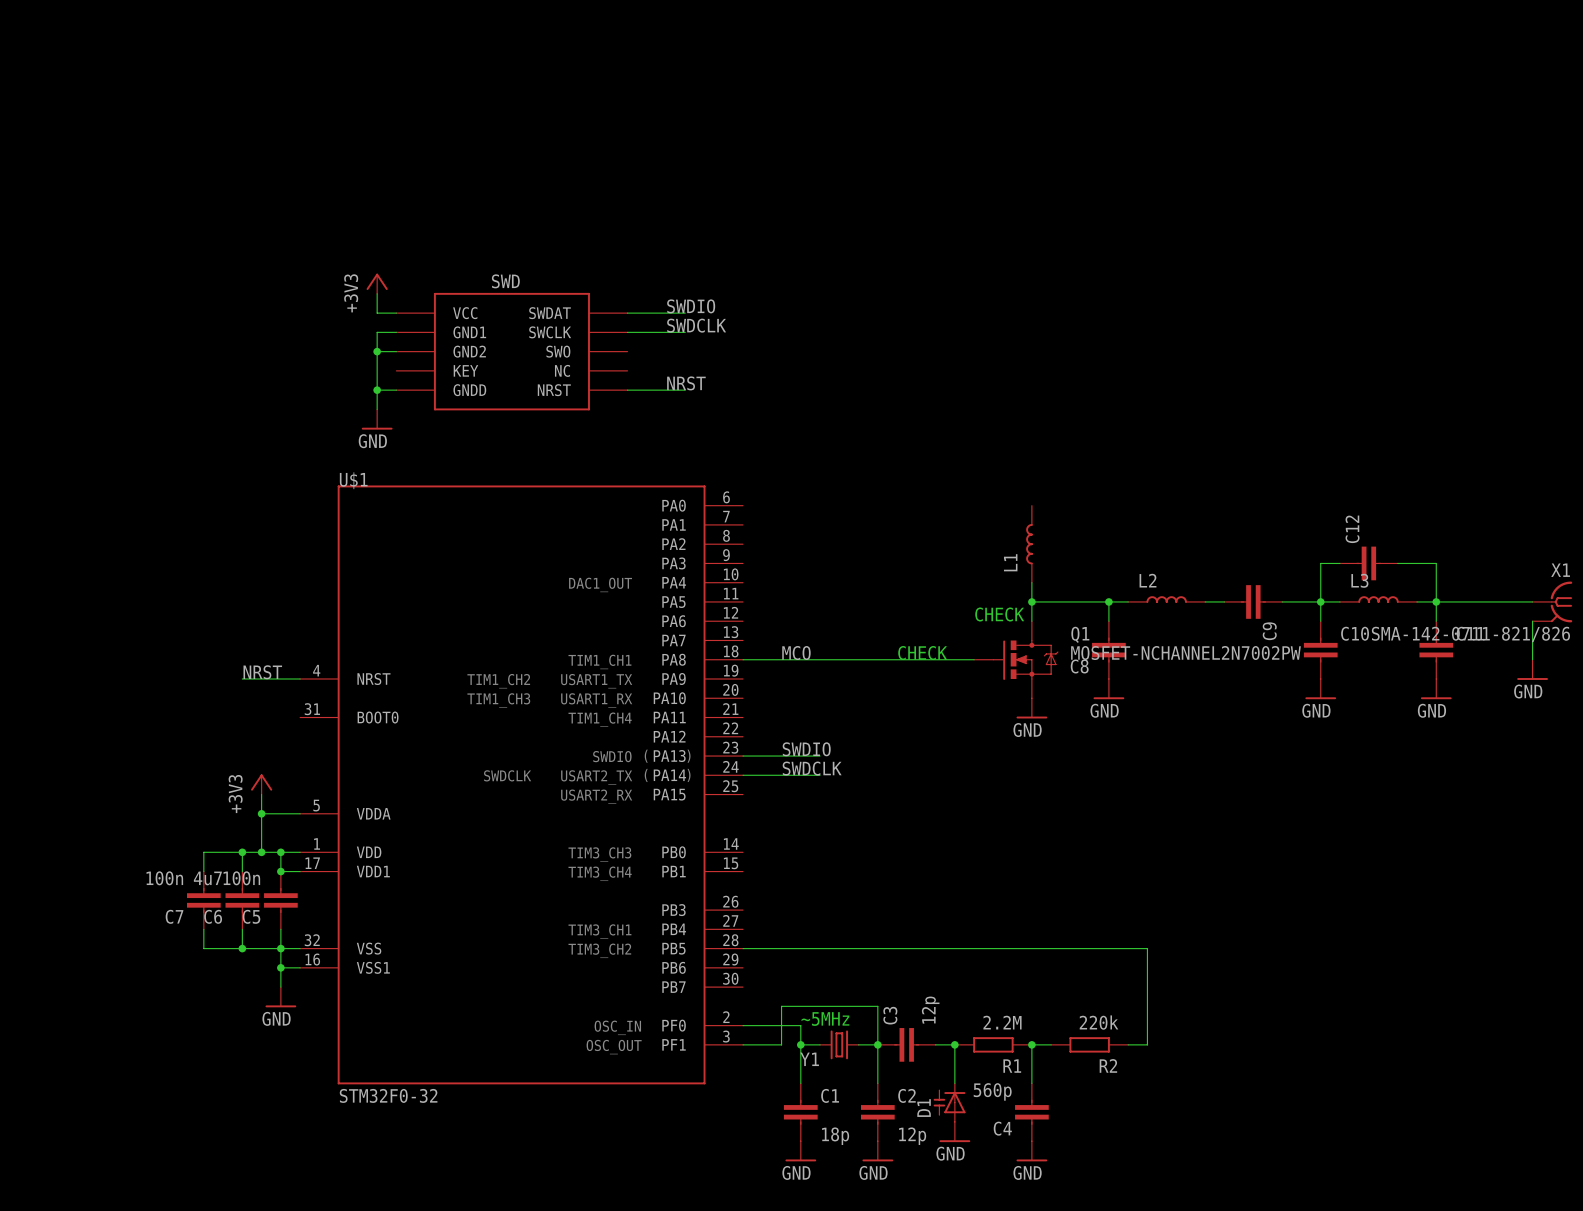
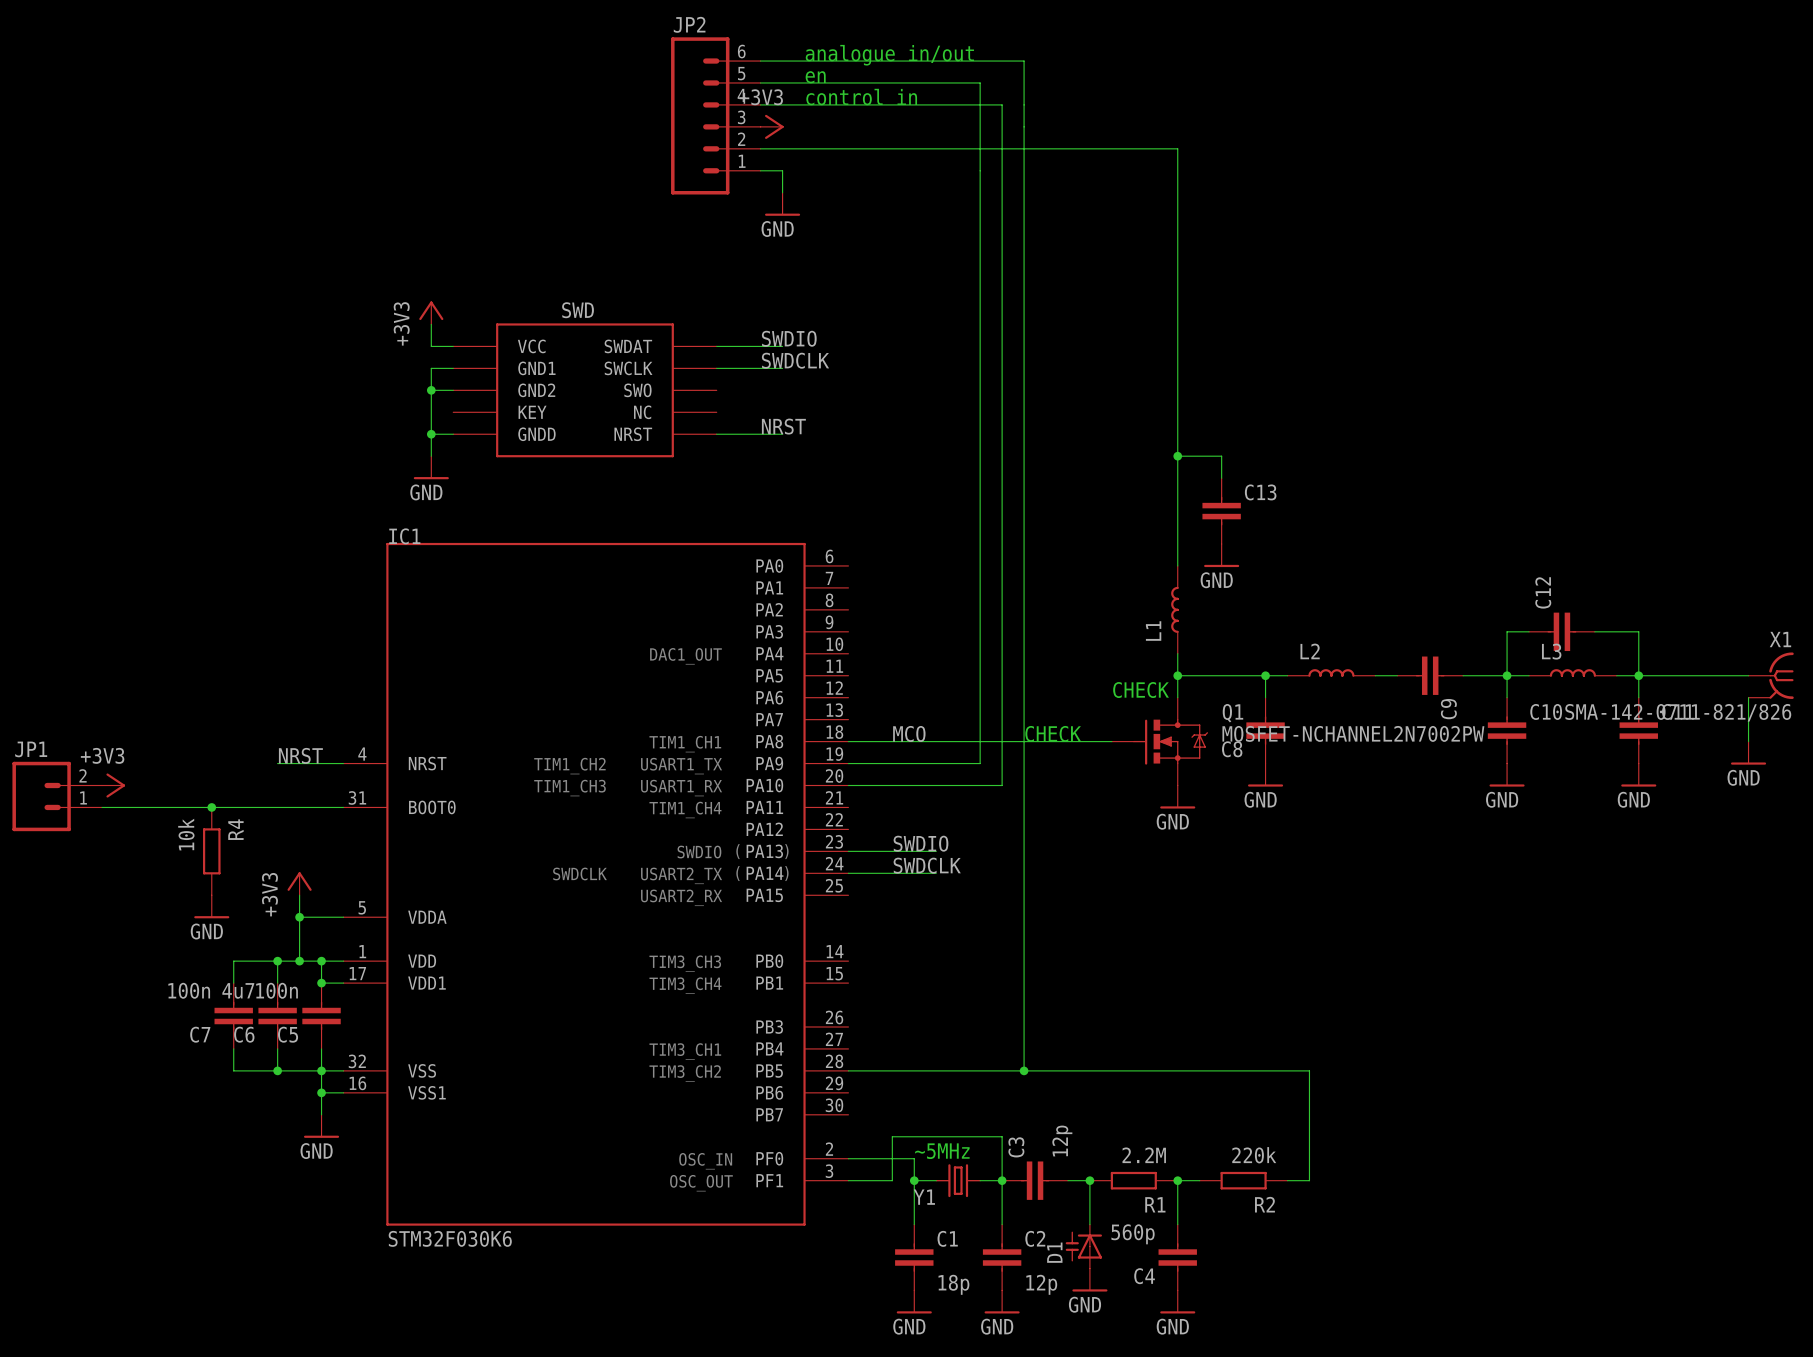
text: none -> analogue in/out (889, 55)
wire: none -> (760, 61) (1024, 61) (1024, 1070)
text: none -> en (815, 77)
wire: none -> (760, 82) (980, 82) (980, 763) (848, 763)
text: none -> control in (861, 97)
wire: none -> (760, 104) (1002, 104) (1002, 785) (848, 785)
JP2: none -> (715, 115)
power symbol: none -> +3V3 (772, 126)
wire: none -> (760, 148) (1177, 148) (1177, 565)
wire: none -> (760, 170) (782, 170) (782, 192)
power symbol: none -> GND (782, 204)
wire: none -> (1177, 456) (1221, 456) (1221, 478)
junction: none -> (1177, 456)
C13: none -> (1221, 511)
U$1 name: U$1 (353, 480) -> IC1 (404, 536)
power symbol: none -> GND (1221, 555)
power symbol: none -> +3V3 (113, 785)
JP1: none -> (57, 796)
wire: none -> (102, 807) (343, 807)
junction: none -> (211, 807)
R4: none -> 10k (211, 851)
power symbol: none -> GND (211, 906)
junction: none -> (1024, 1070)
U$1 value: STM32F0-32 (388, 1095) -> STM32F030K6 (450, 1238)

